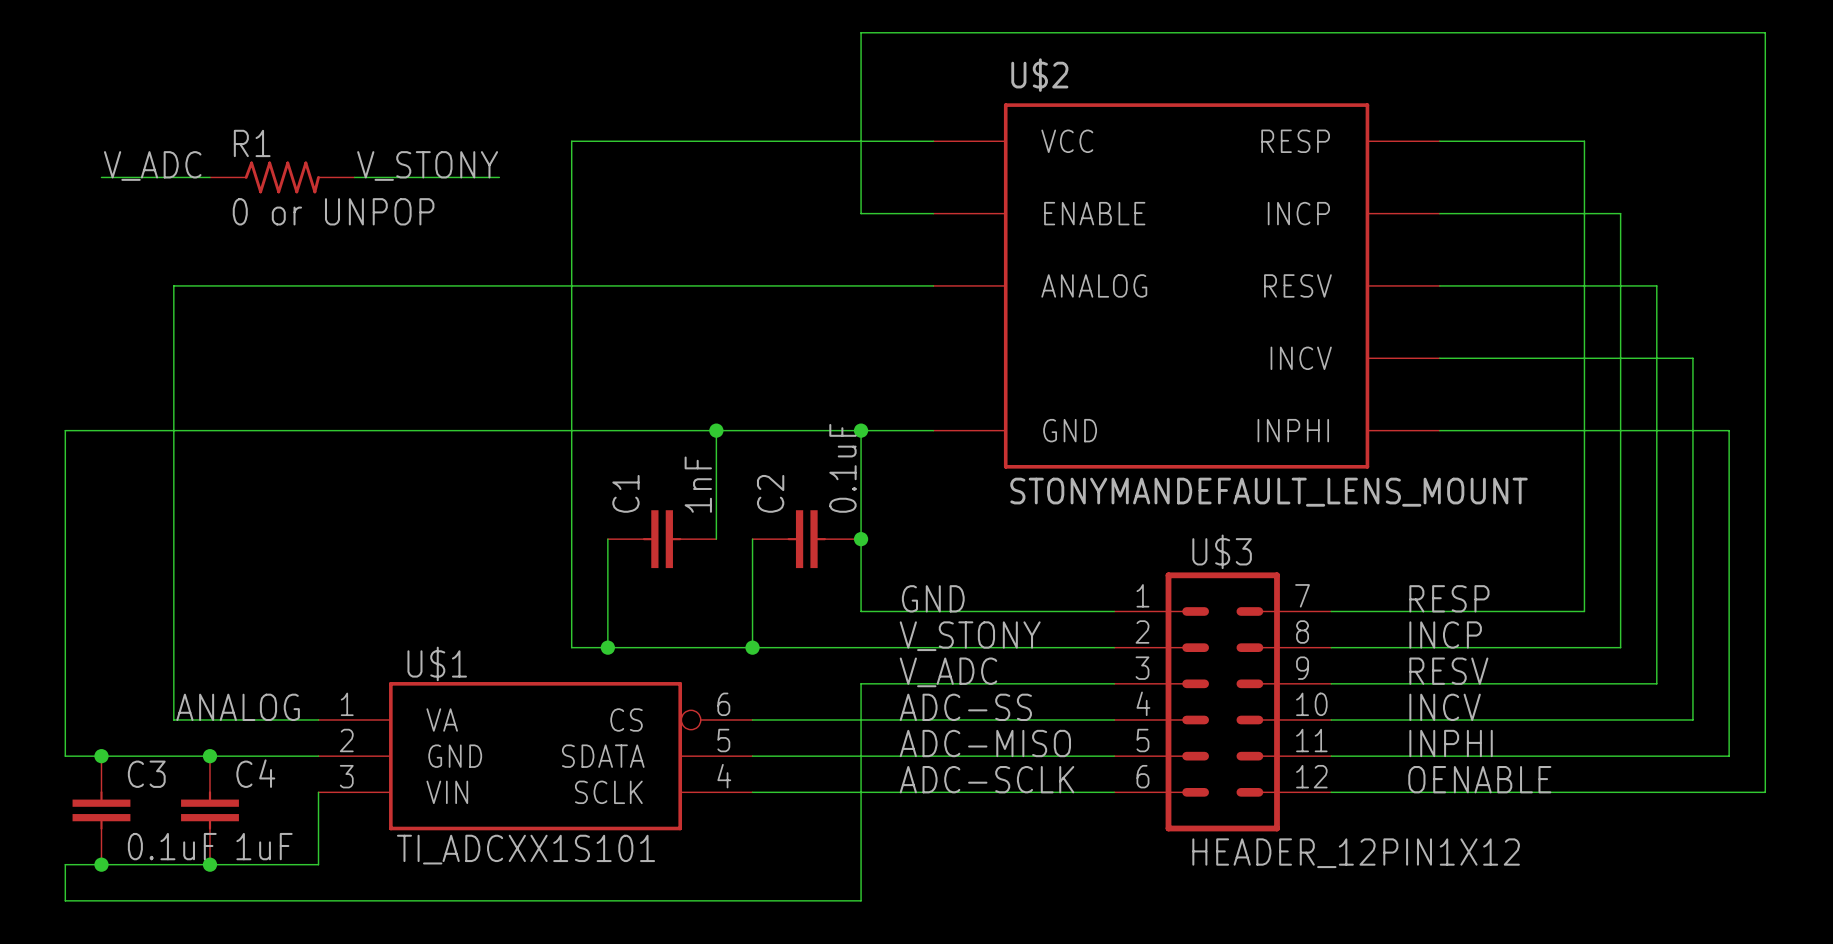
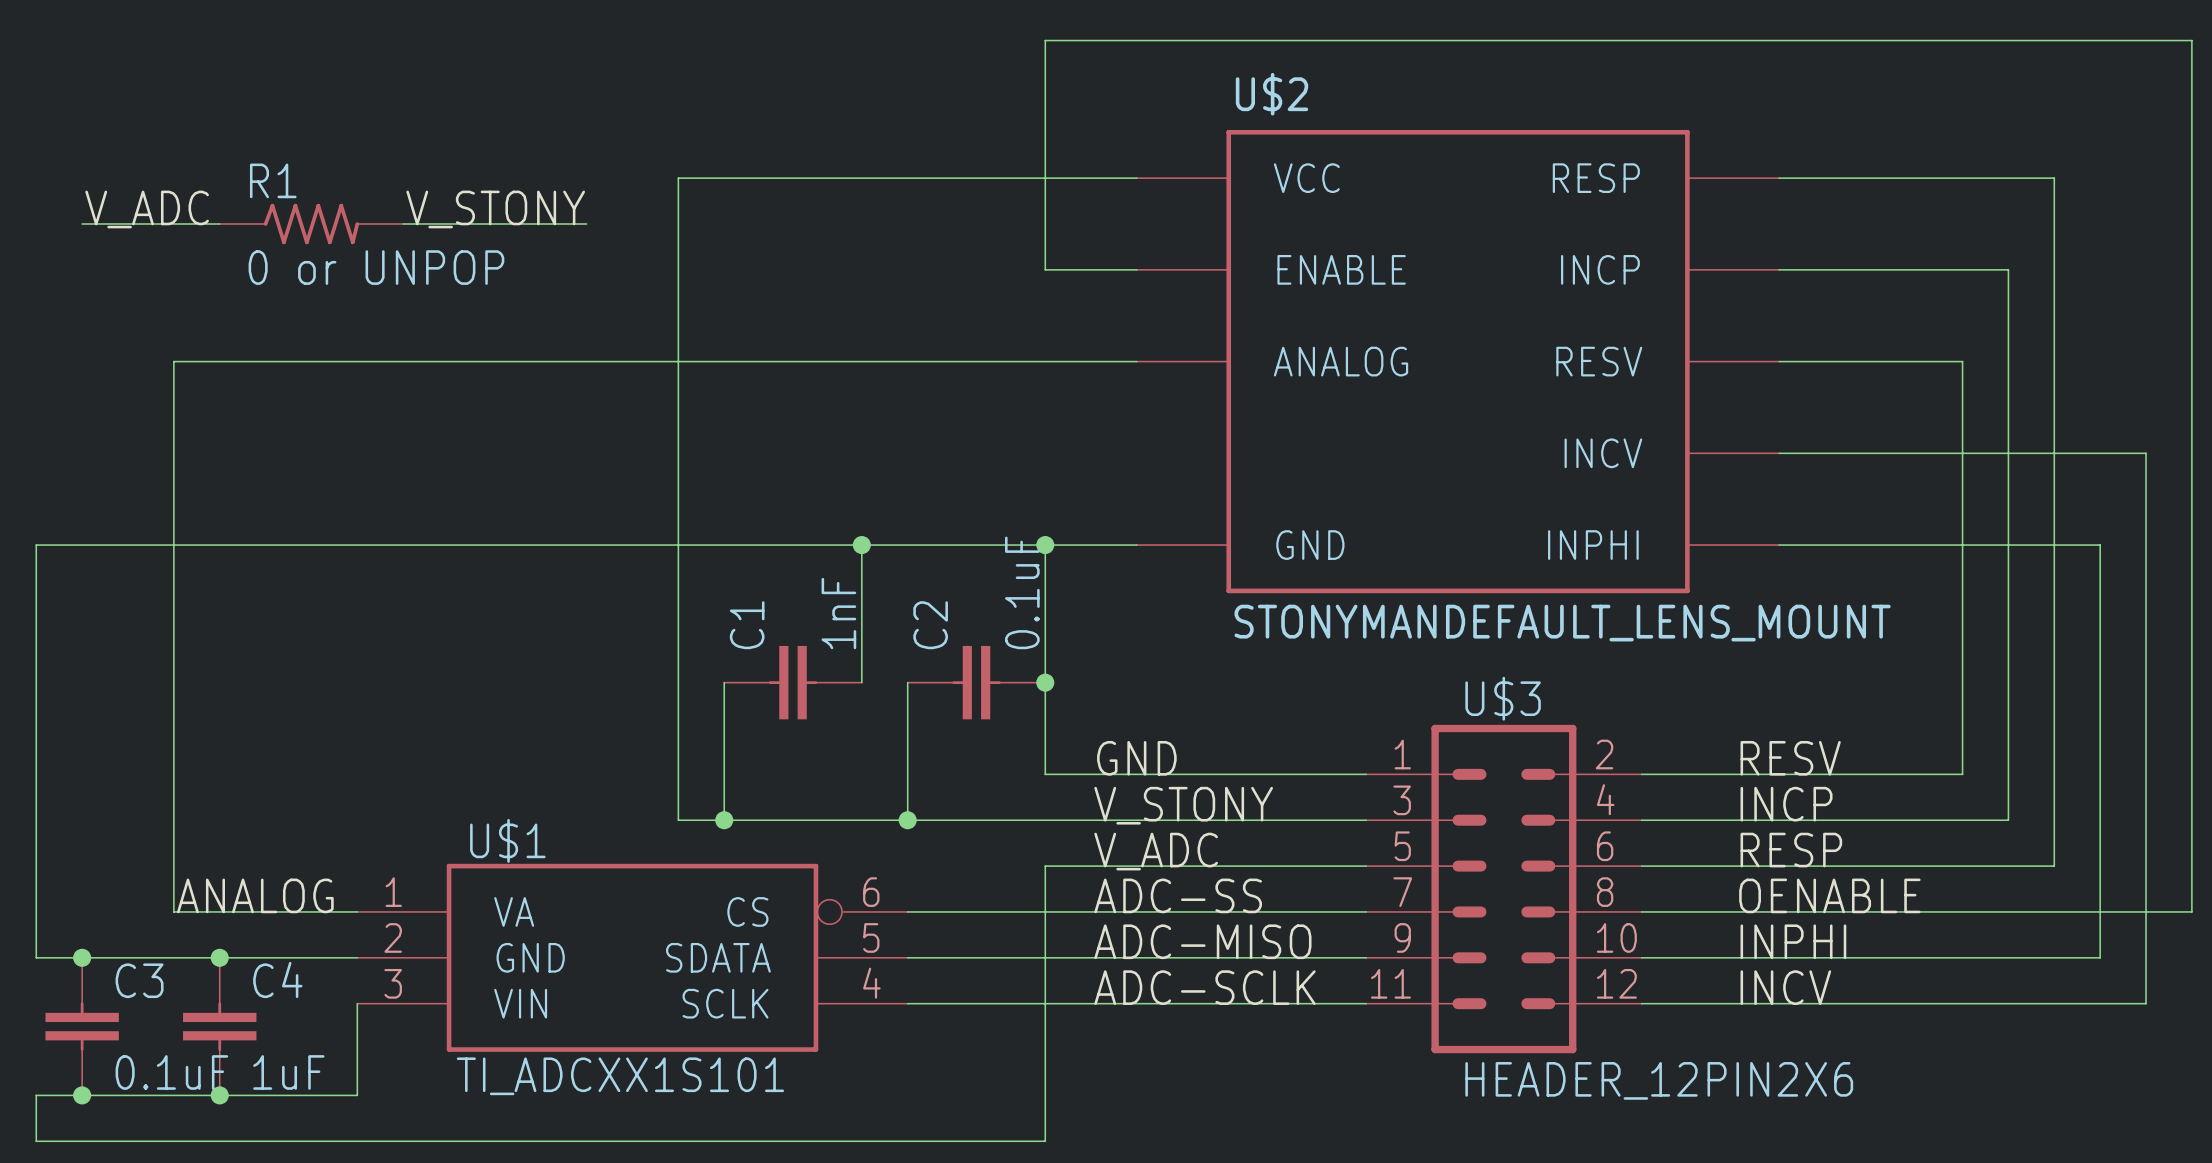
wire: (1584, 141) (1584, 285) (1656, 285) -> (1962, 178) (2054, 178) (2054, 361)
wire: (1692, 358) (1692, 430) (1729, 430) -> (2100, 453) (2146, 453) (2146, 545)
U$3 symbol: [1114, 572, 1332, 832] -> [1366, 724, 1642, 1054]
label: RESP (1449, 598) -> RESV (1790, 758)
label: RESV (1448, 671) -> RESP (1791, 850)
label: INCV (1445, 707) -> OENABLE (1829, 895)
wire: (1765, 719) (1765, 792) (1729, 792) -> (2146, 957) (2146, 1003)
wire: (1692, 756) (1729, 756) -> (2100, 957) (2100, 911) (2191, 911)
label: OENABLE (1479, 779) -> INCV (1785, 987)
U$3 value: HEADER_12PIN1X12 (1356, 853) -> HEADER_12PIN2X6 (1659, 1080)

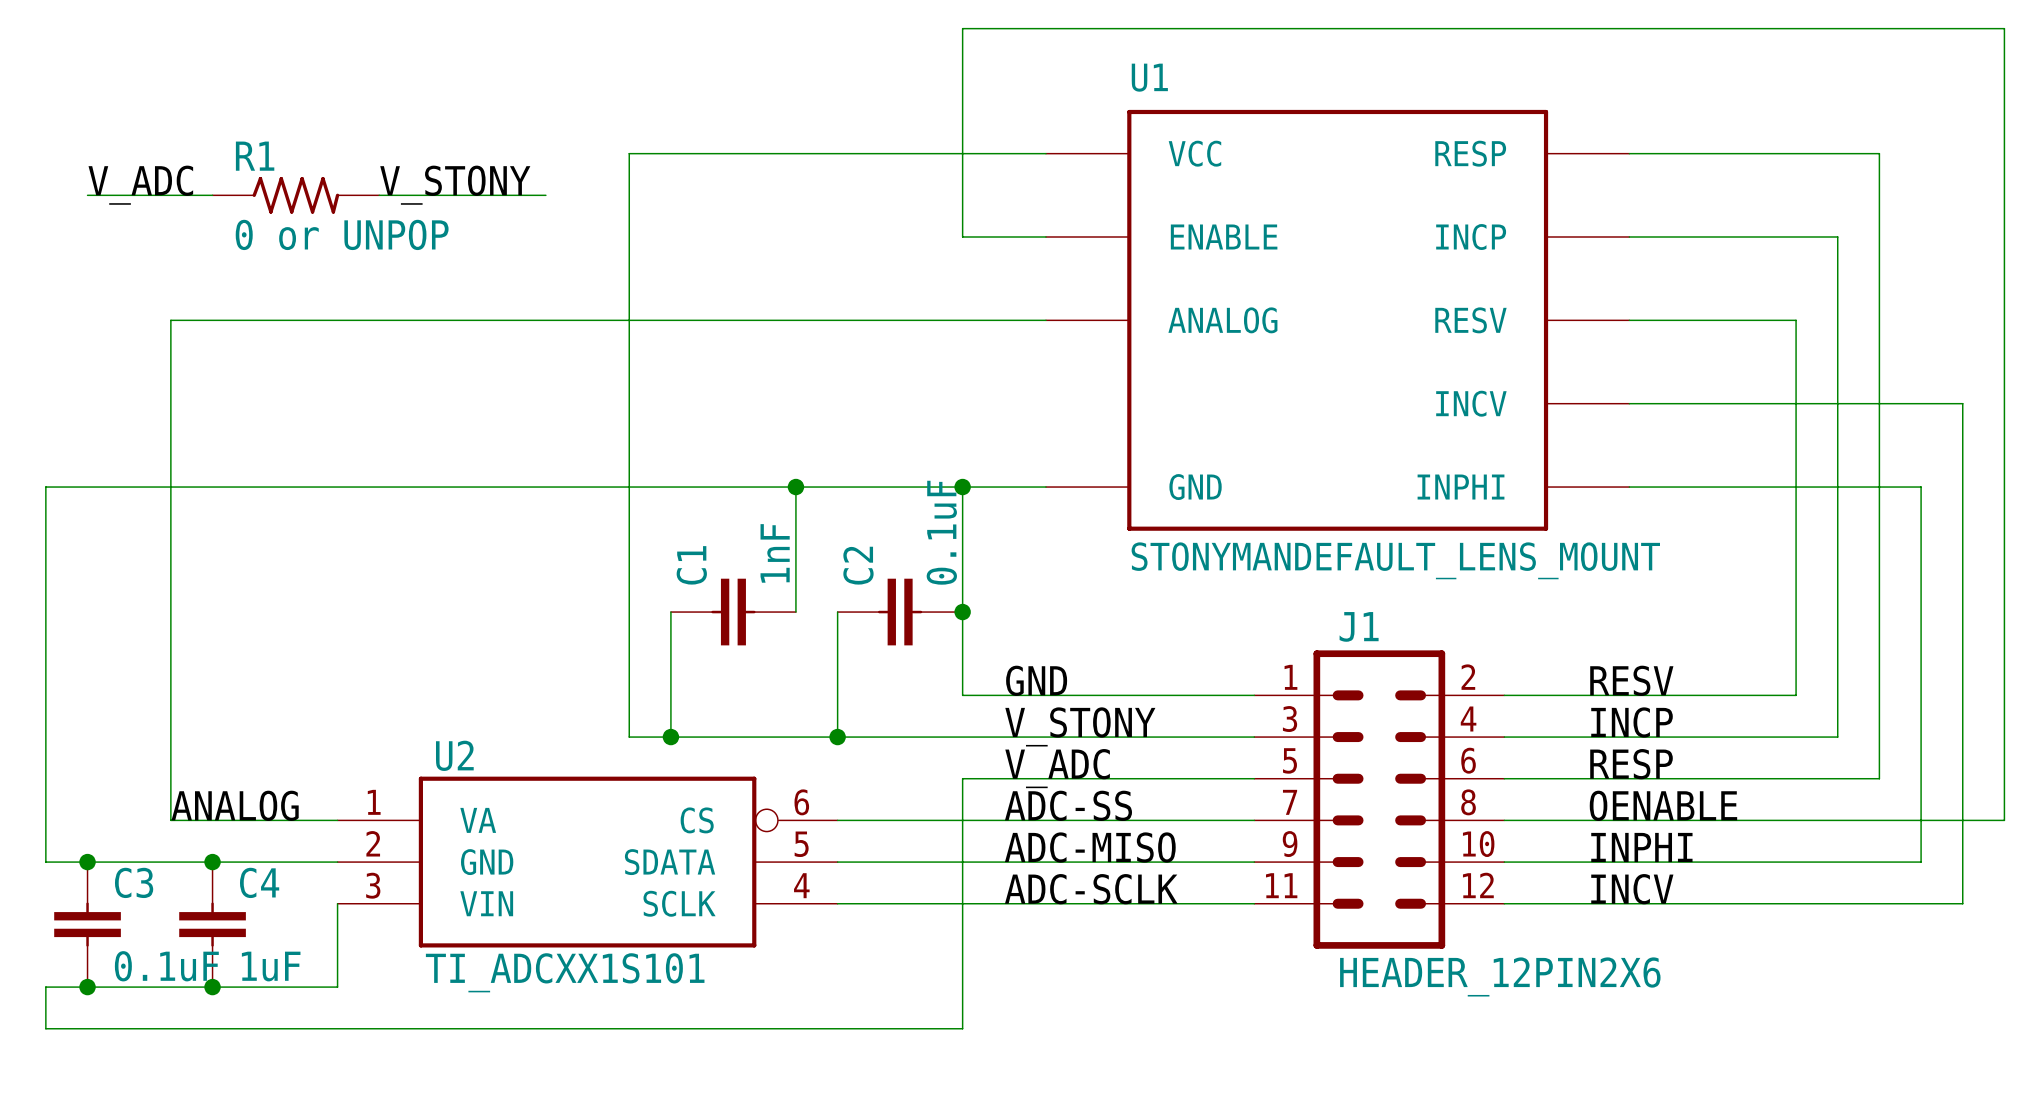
U$2 name: U$2 (1271, 94) -> U1 (1149, 77)
U$3 name: U$3 (1503, 698) -> J1 (1359, 626)
U$1 name: U$1 (507, 840) -> U2 (454, 755)

